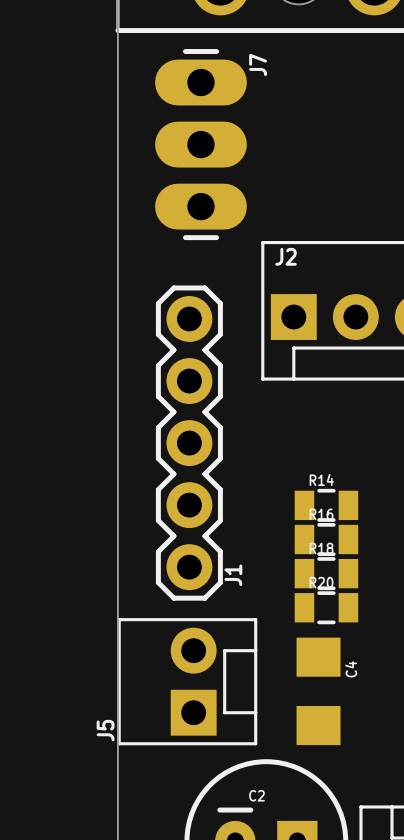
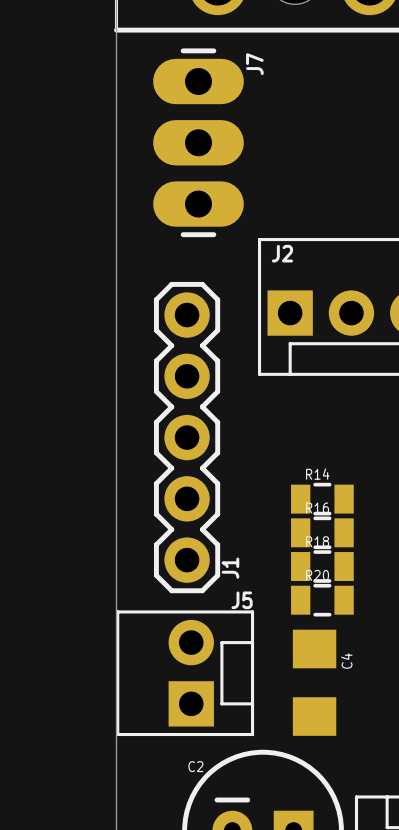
J5 name rotation: 0° (105, 730) -> 90° clockwise (242, 600)
J5 name position: J5 (105, 730) -> J5 (242, 600)
C2 name position: C2 (256, 795) -> C2 (195, 766)

